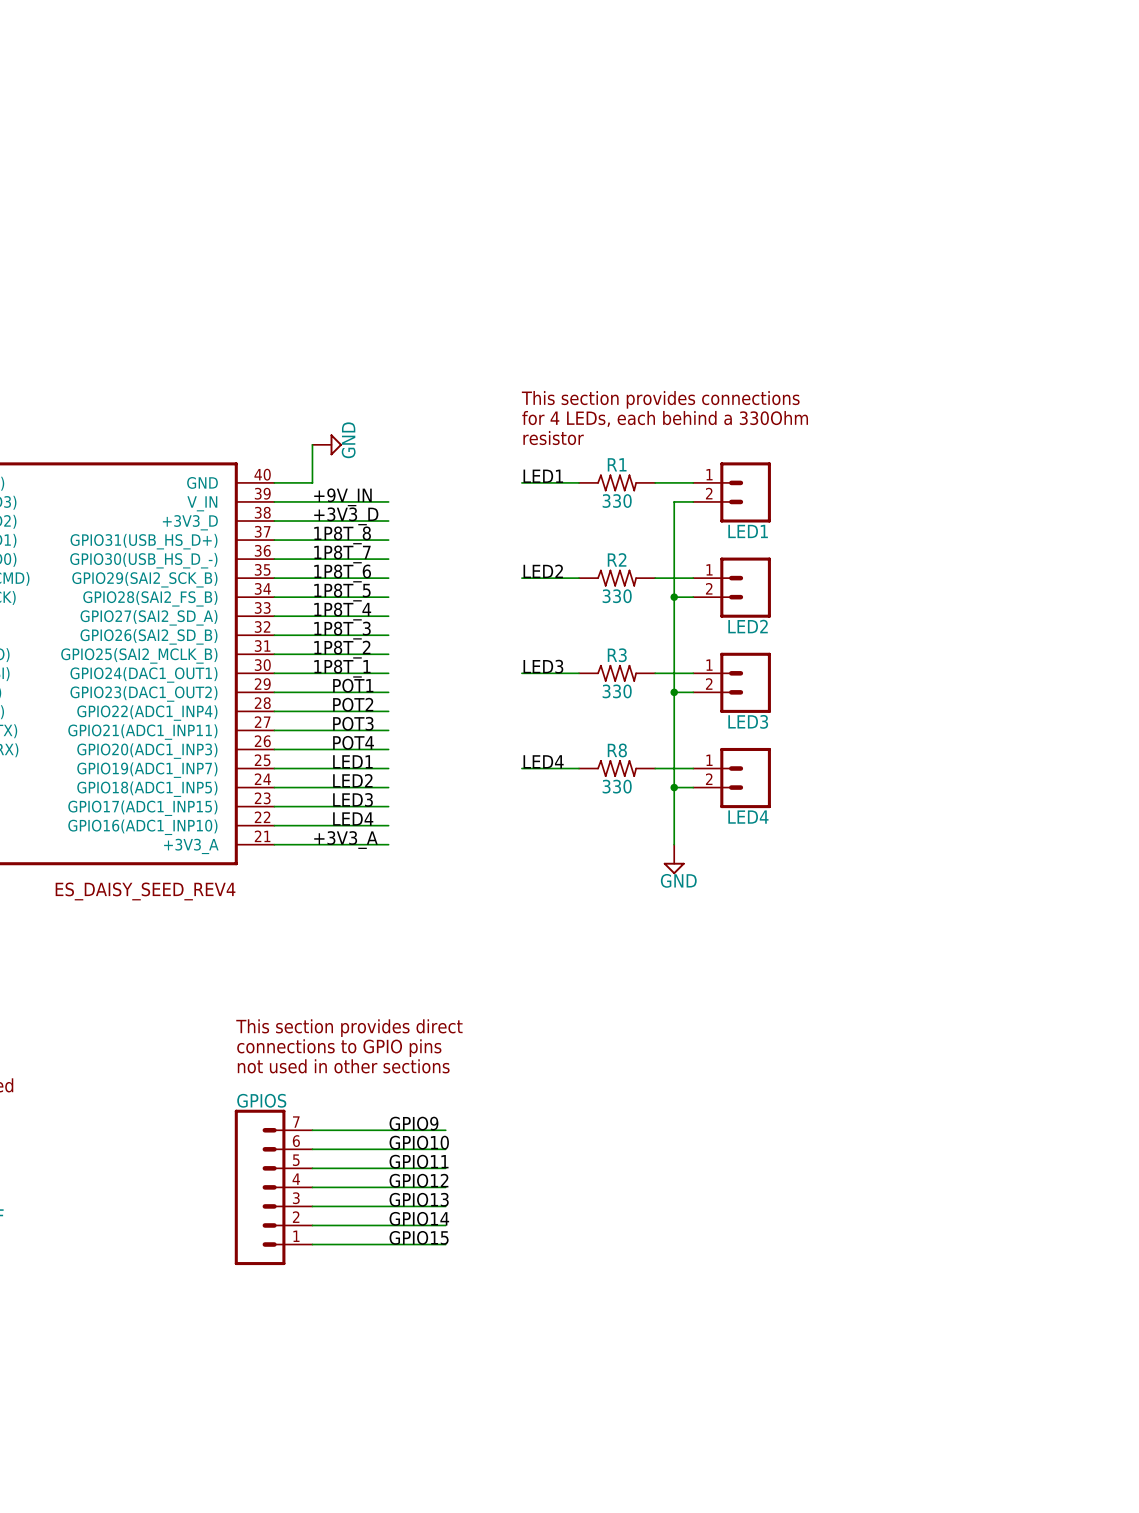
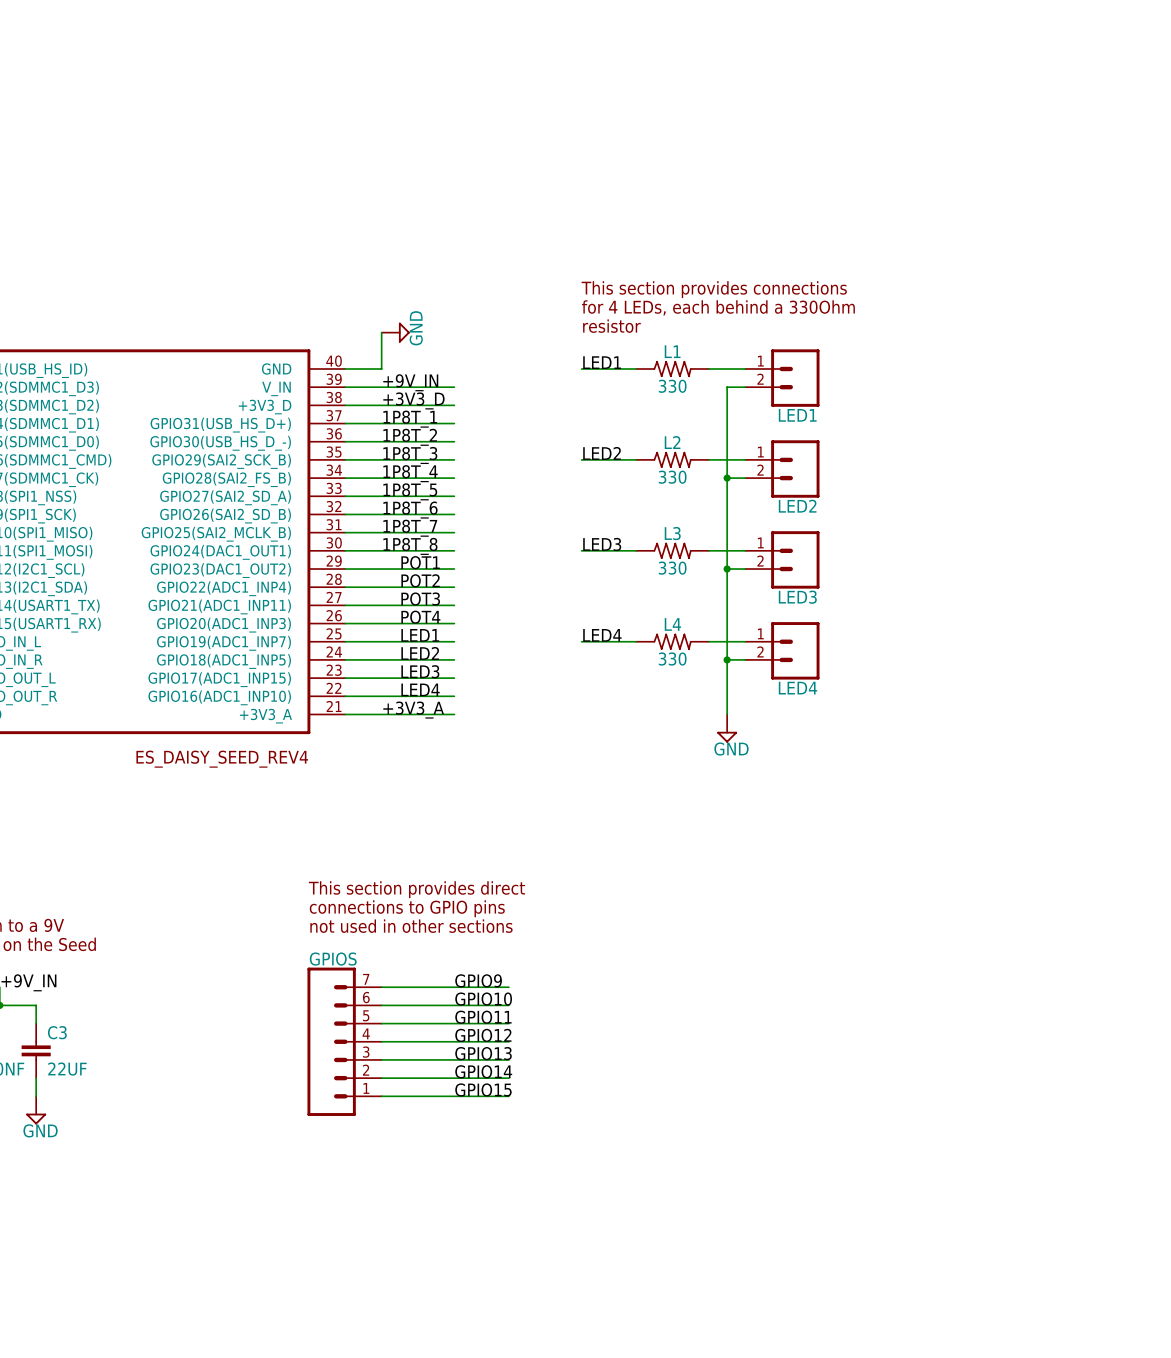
R1 name: R1 (617, 464) -> L1 (672, 351)
label: 1P8T_8 (342, 535) -> 1P8T_1 (410, 419)
label: 1P8T_7 (342, 554) -> 1P8T_2 (410, 437)
R2 name: R2 (617, 559) -> L2 (672, 442)
label: 1P8T_6 (342, 573) -> 1P8T_3 (410, 455)
label: 1P8T_5 (342, 592) -> 1P8T_4 (410, 473)
label: 1P8T_4 (342, 611) -> 1P8T_5 (410, 491)
label: 1P8T_3 (342, 630) -> 1P8T_6 (410, 510)
label: 1P8T_2 (342, 649) -> 1P8T_7 (410, 528)
R3 name: R3 (617, 655) -> L3 (672, 533)
label: 1P8T_1 (342, 668) -> 1P8T_8 (410, 546)
R8 name: R8 (617, 750) -> L4 (672, 624)

